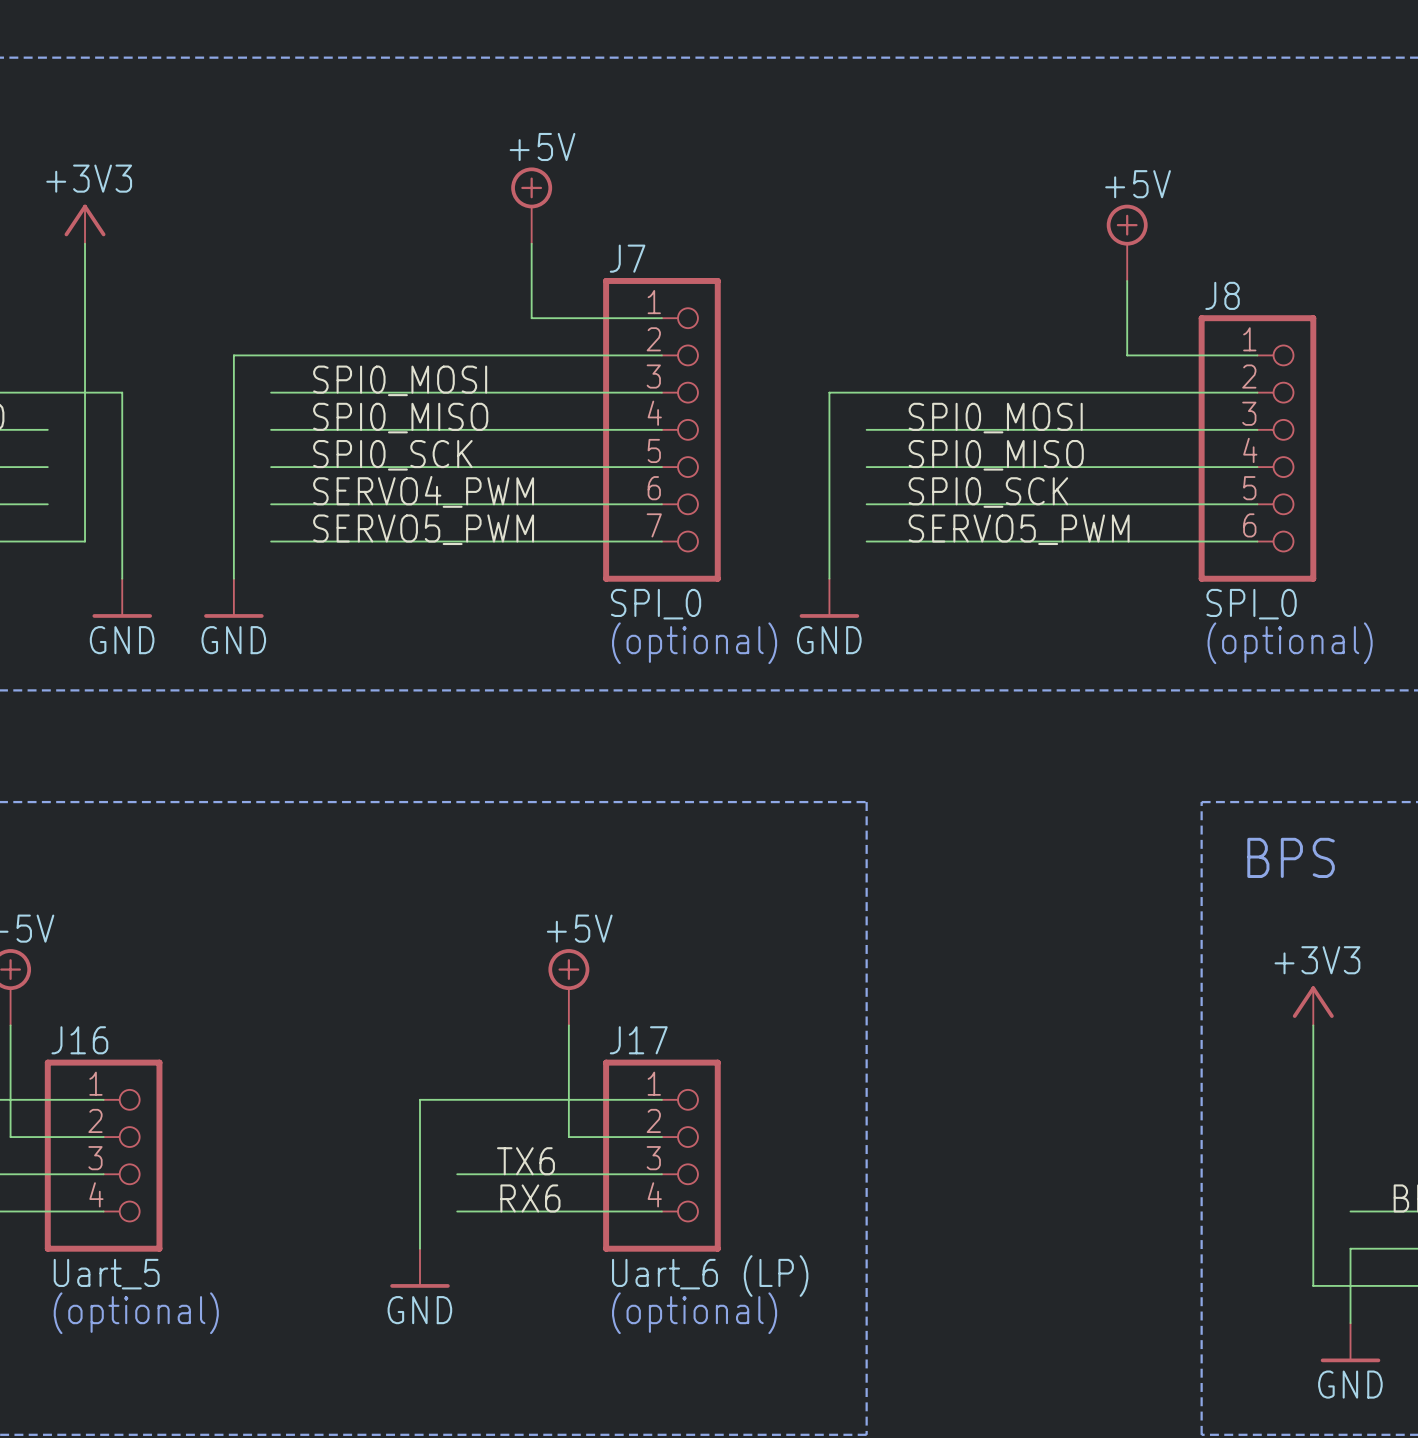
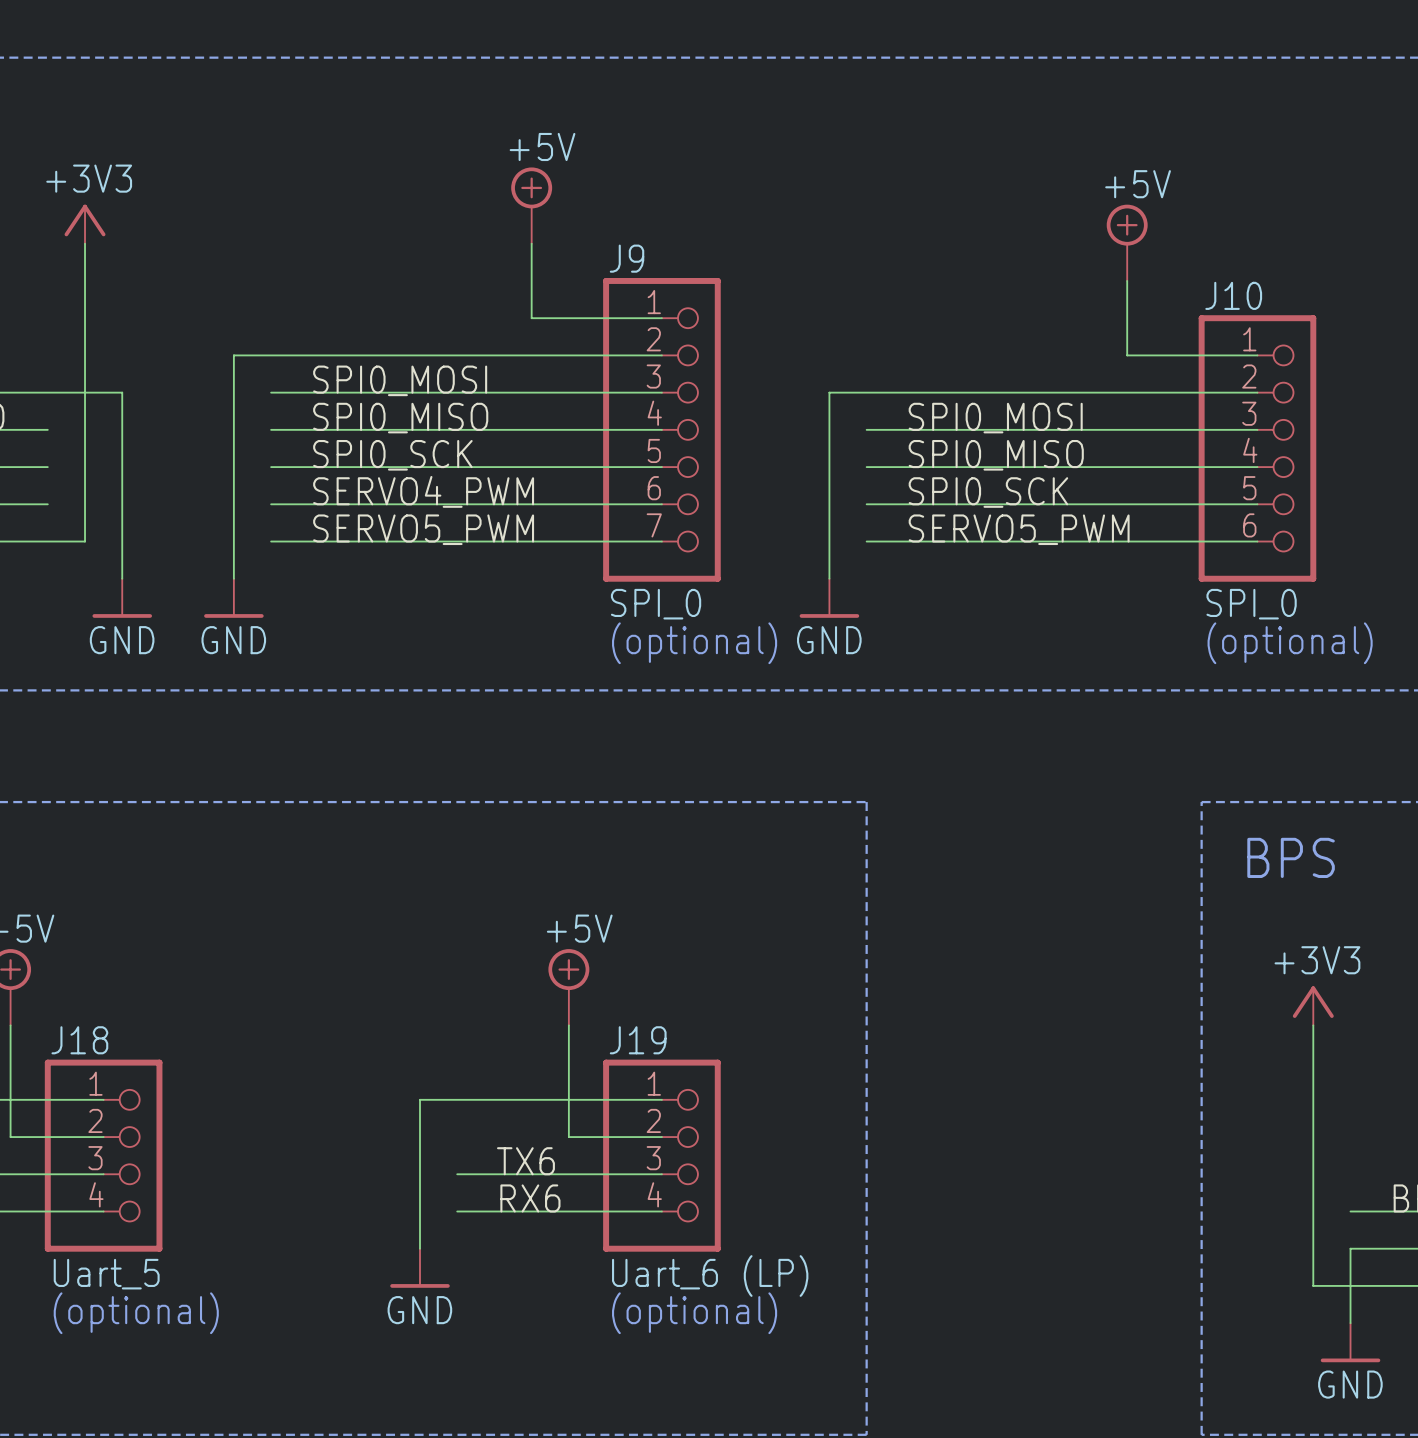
J7 name: J7 (627, 258) -> J9 (627, 258)
J8 name: J8 (1222, 295) -> J10 (1233, 295)
J16 name: J16 (79, 1040) -> J18 (79, 1040)
J17 name: J17 (638, 1040) -> J19 (638, 1040)

